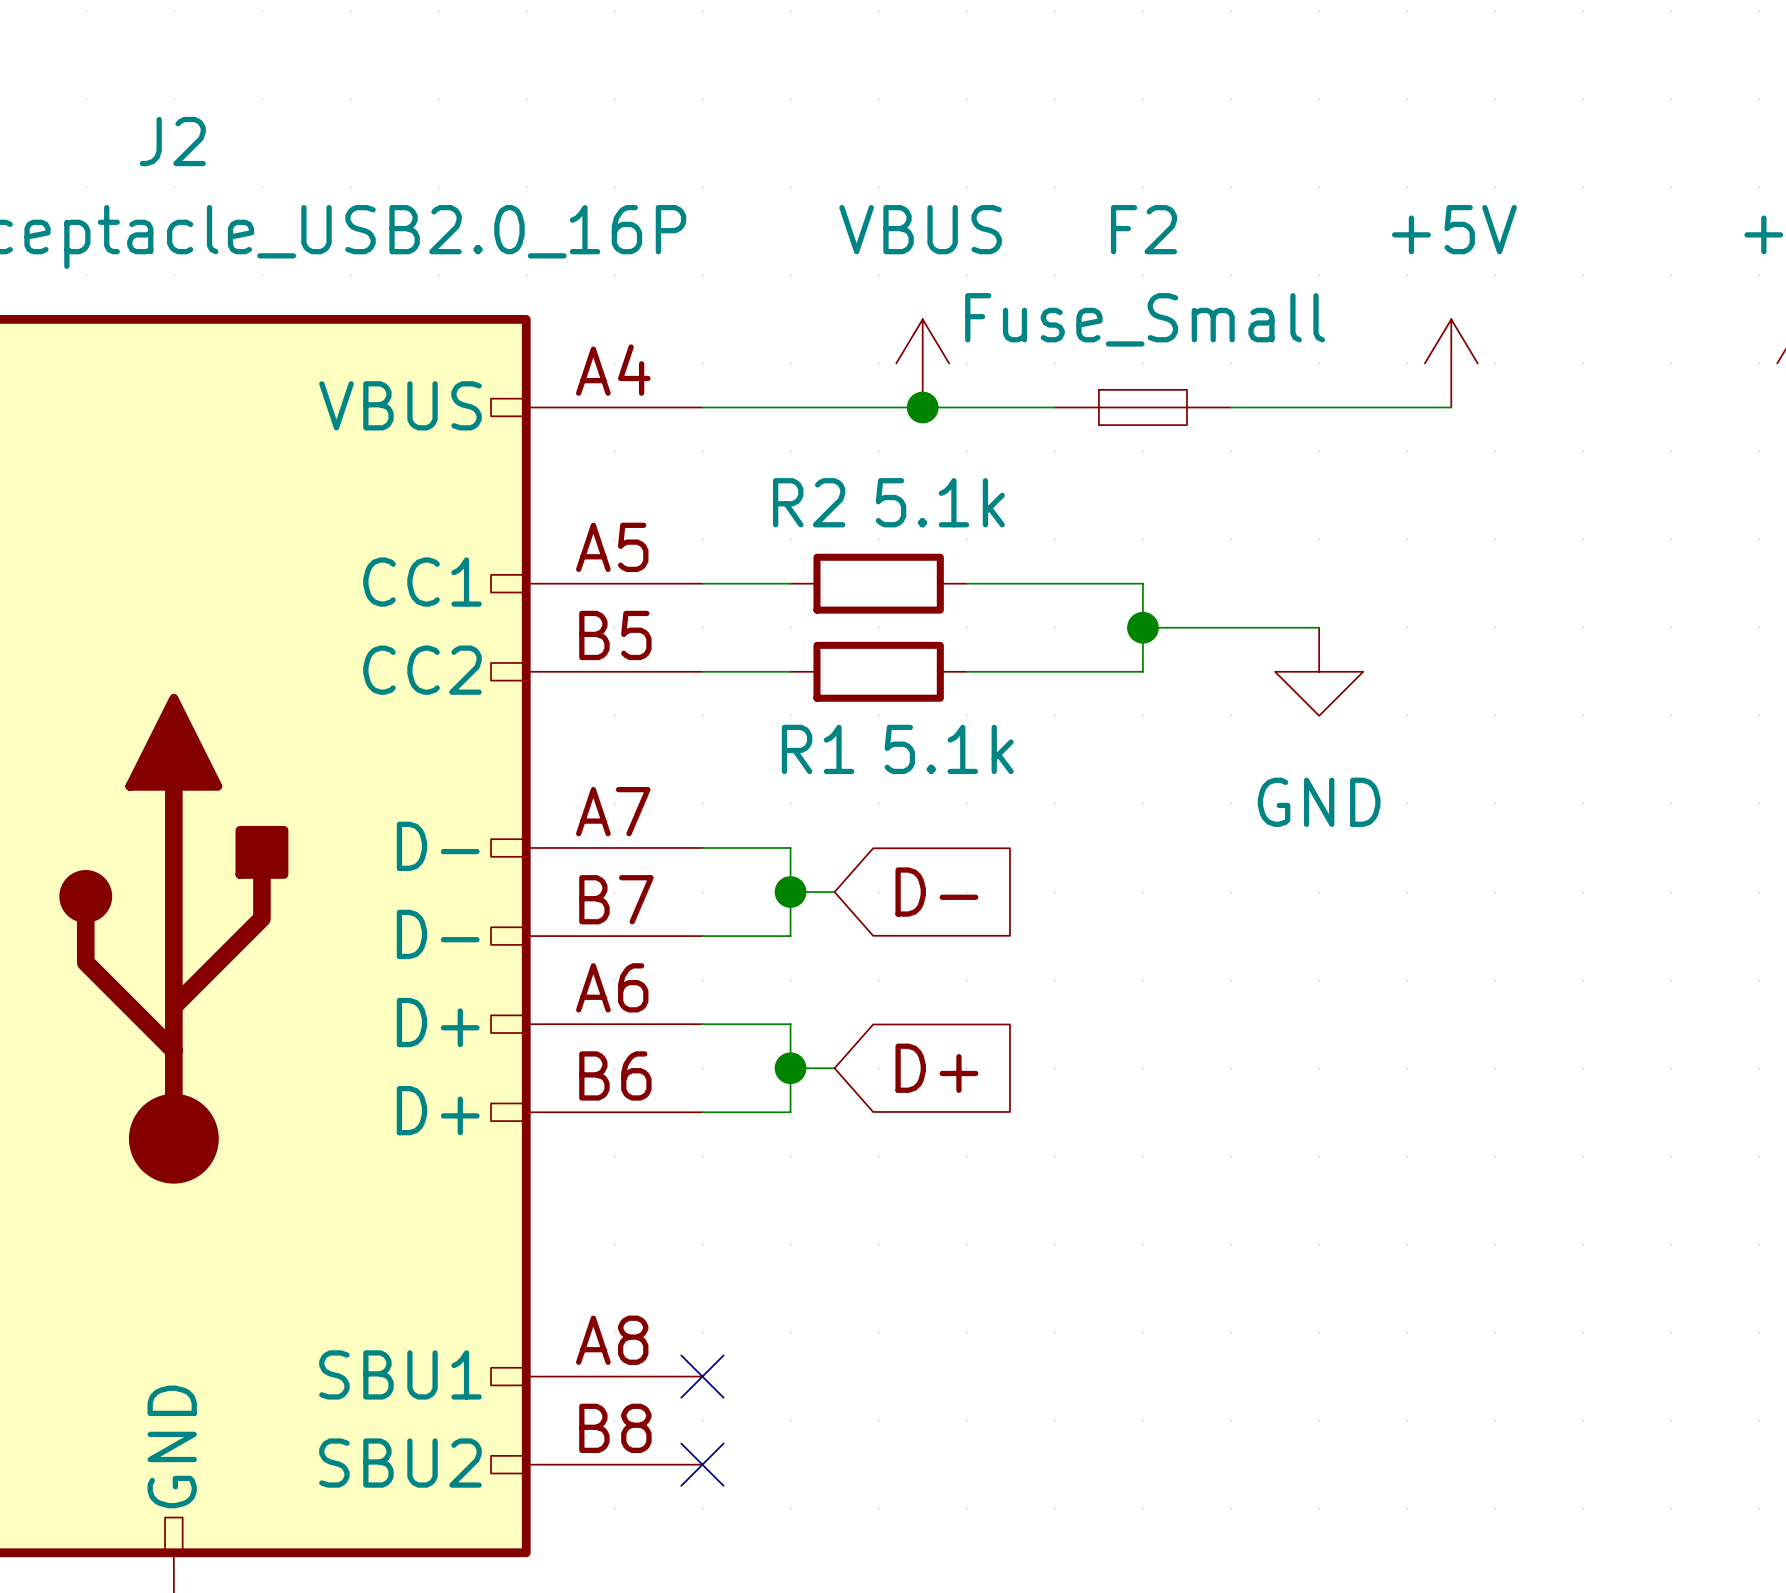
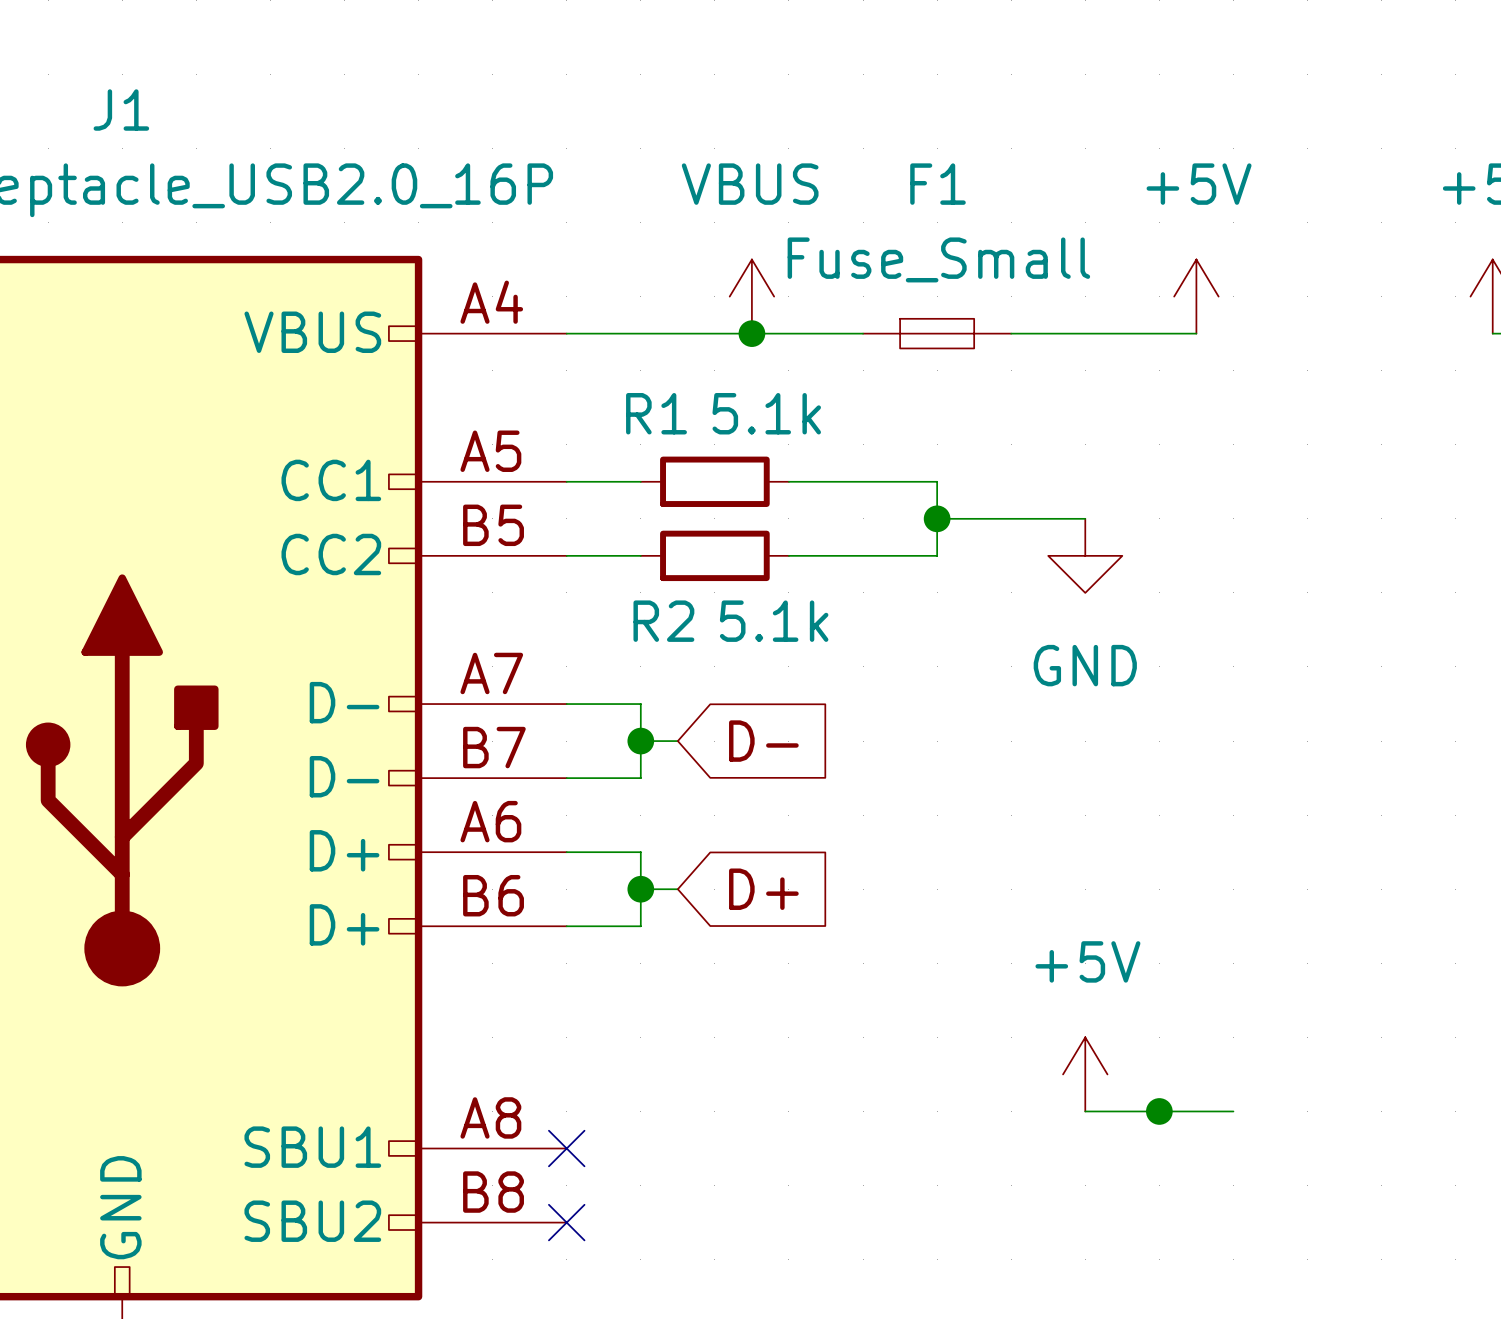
J2 name: J2 (172, 141) -> J1 (121, 110)
F2 name: F2 (1144, 229) -> F1 (938, 184)
R2 name: R2 (809, 502) -> R1 (656, 413)
R1 name: R1 (818, 749) -> R2 (663, 621)
power symbol: none -> +5V (1085, 1074)
wire: none -> (1085, 1111) (1233, 1111)
junction: none -> (1159, 1111)

